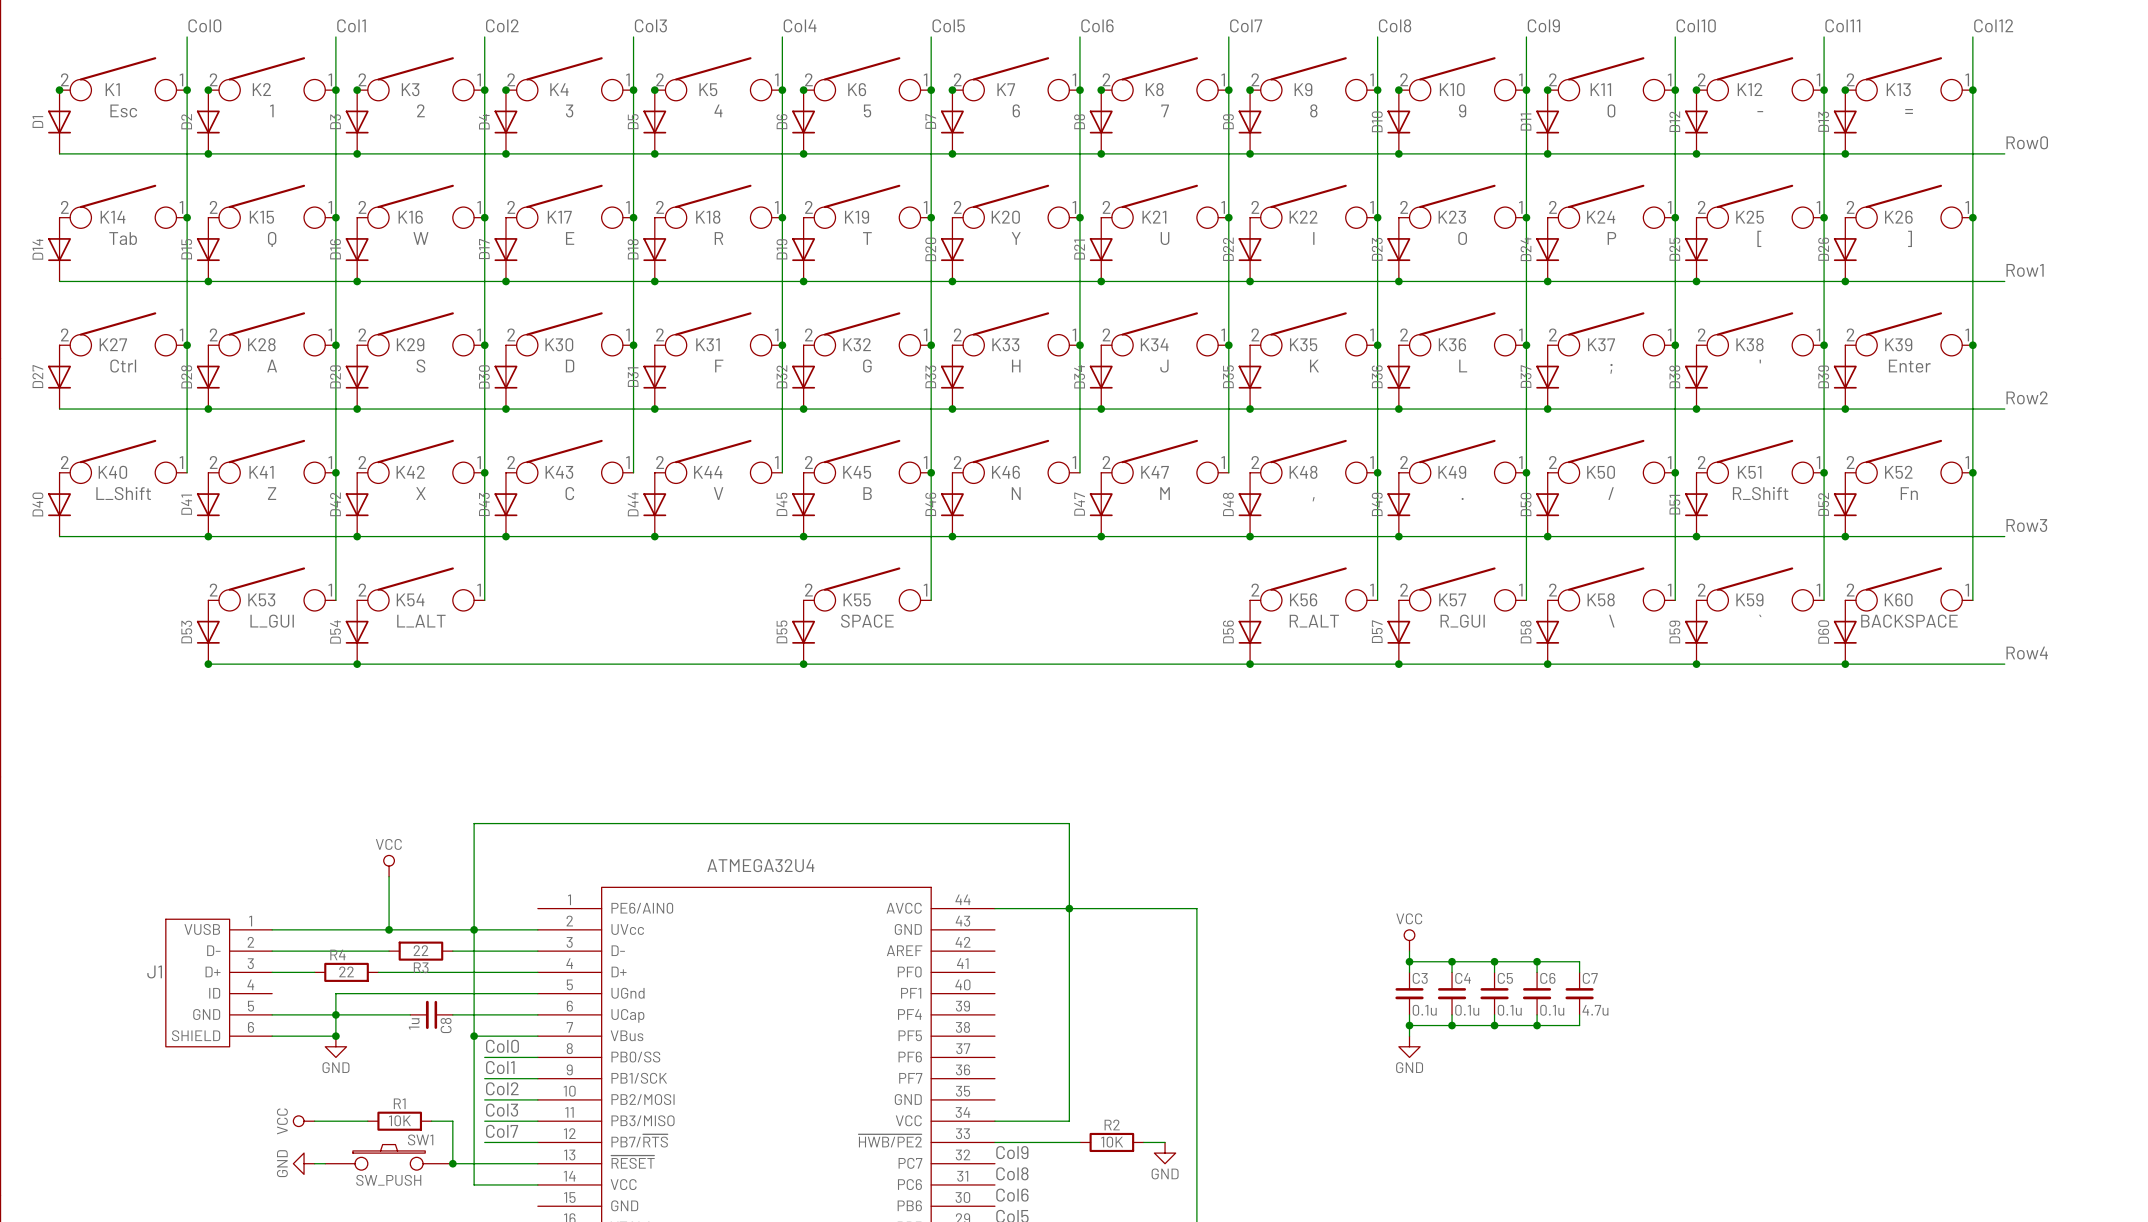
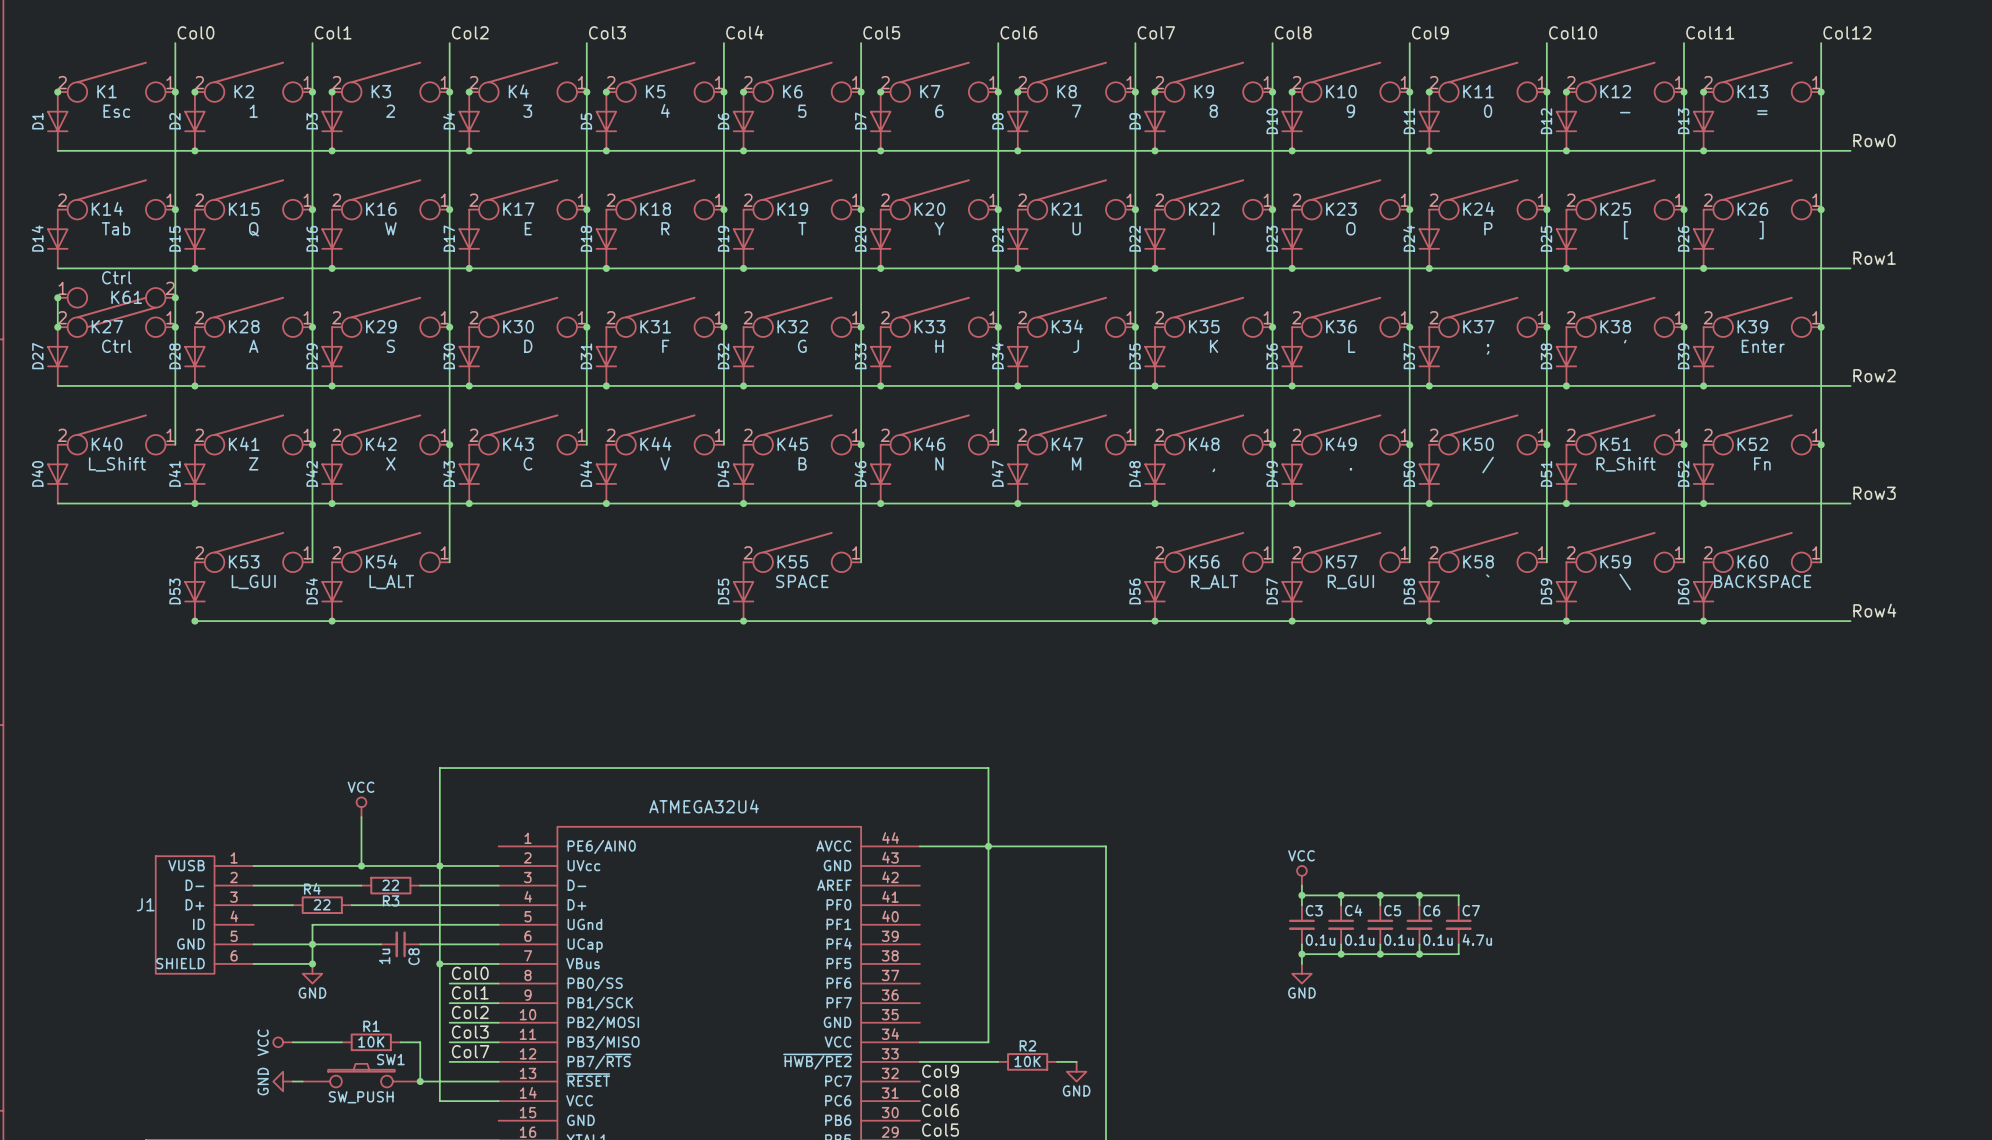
wire: none -> (57, 297) (57, 327)
junction: none -> (57, 297)
junction: none -> (175, 297)
K61: none -> Ctrl (116, 308)
junction: none -> (57, 327)
K59 value: ` (1760, 615) -> \ (1625, 582)
K58 value: \ (1611, 621) -> ` (1487, 575)

